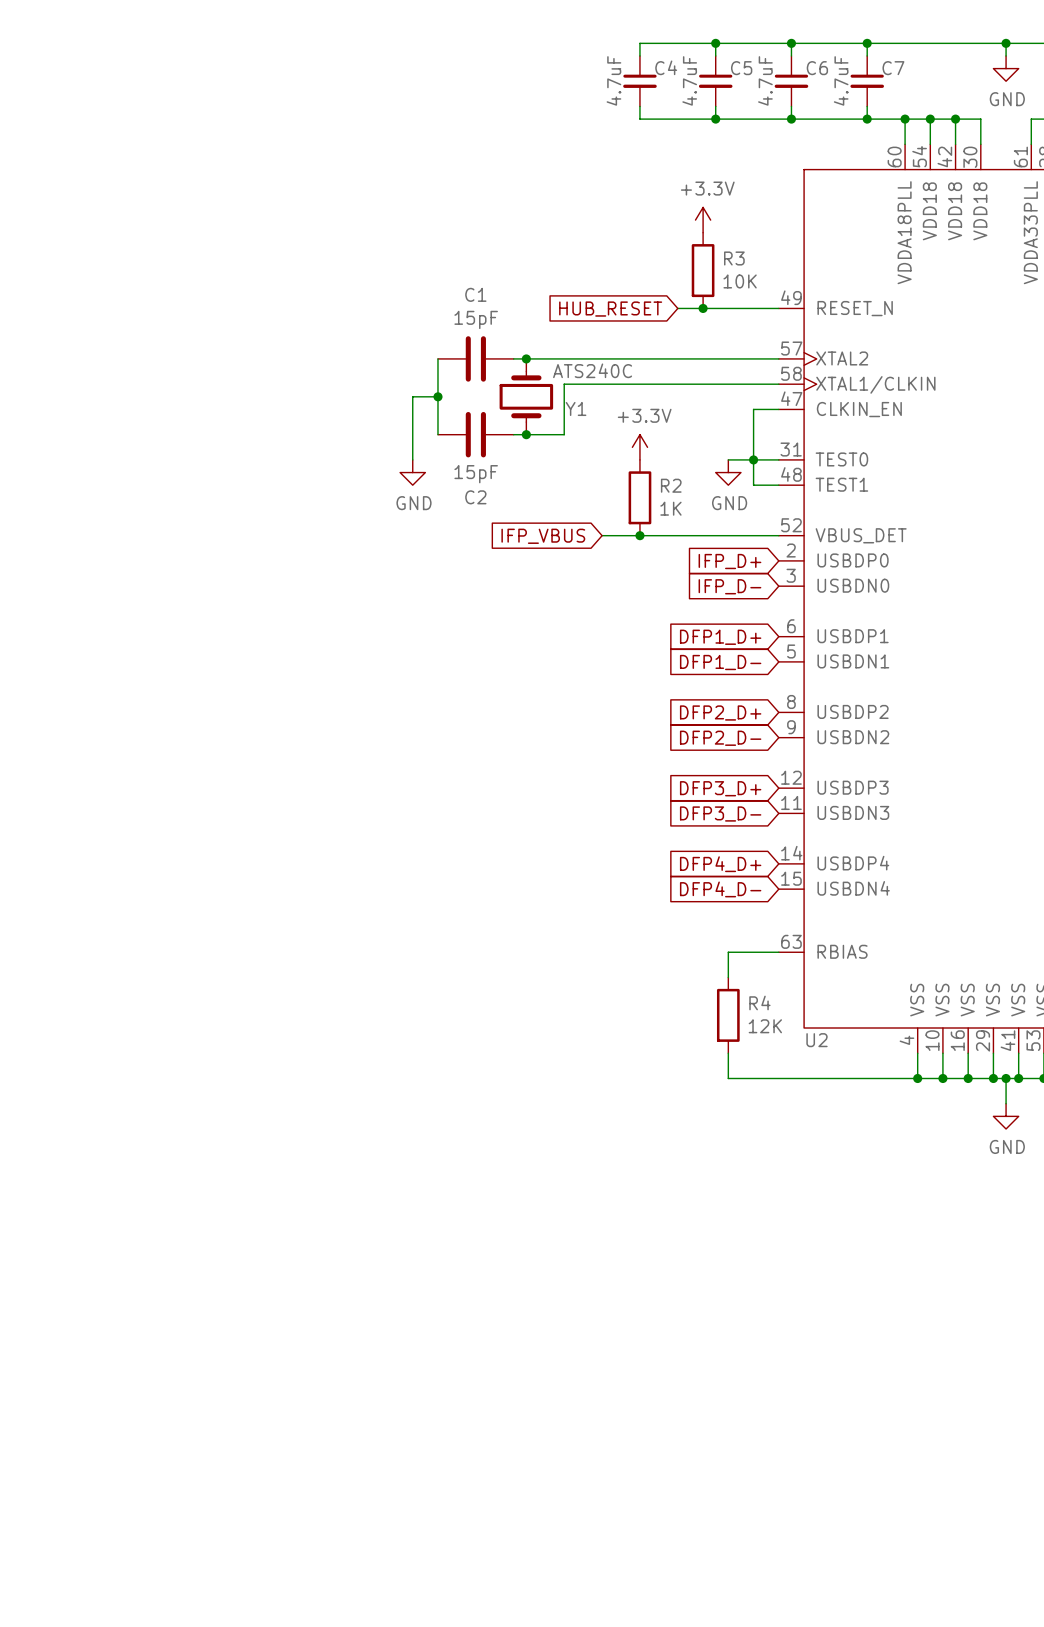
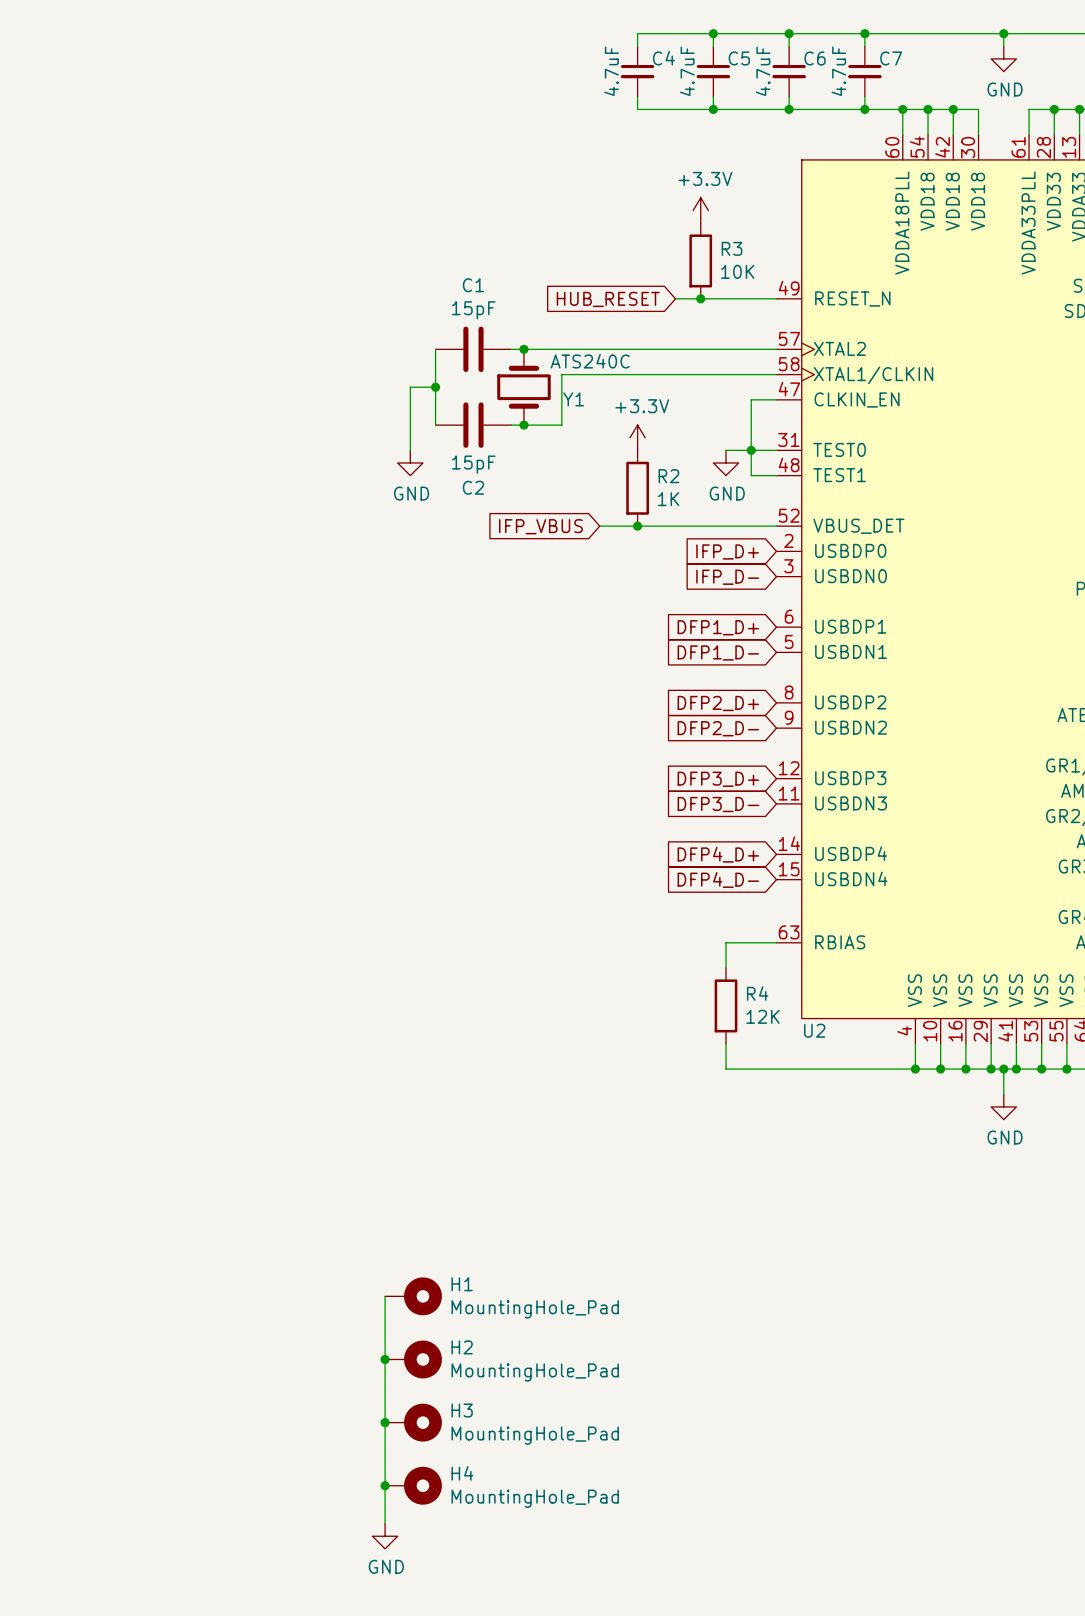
wire: none -> (385, 1296) (385, 1523)
H1: none -> MountingHole_Pad (413, 1296)
junction: none -> (385, 1359)
H2: none -> MountingHole_Pad (413, 1359)
junction: none -> (385, 1422)
H3: none -> MountingHole_Pad (413, 1422)
junction: none -> (385, 1485)
H4: none -> MountingHole_Pad (413, 1485)
power symbol: none -> GND (385, 1536)

